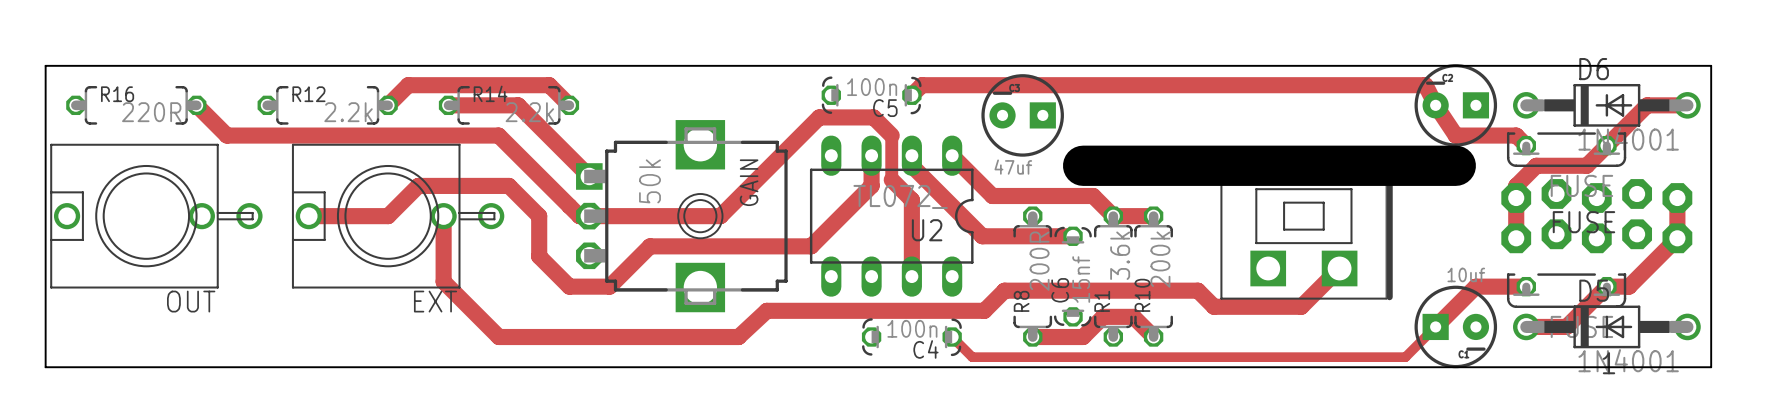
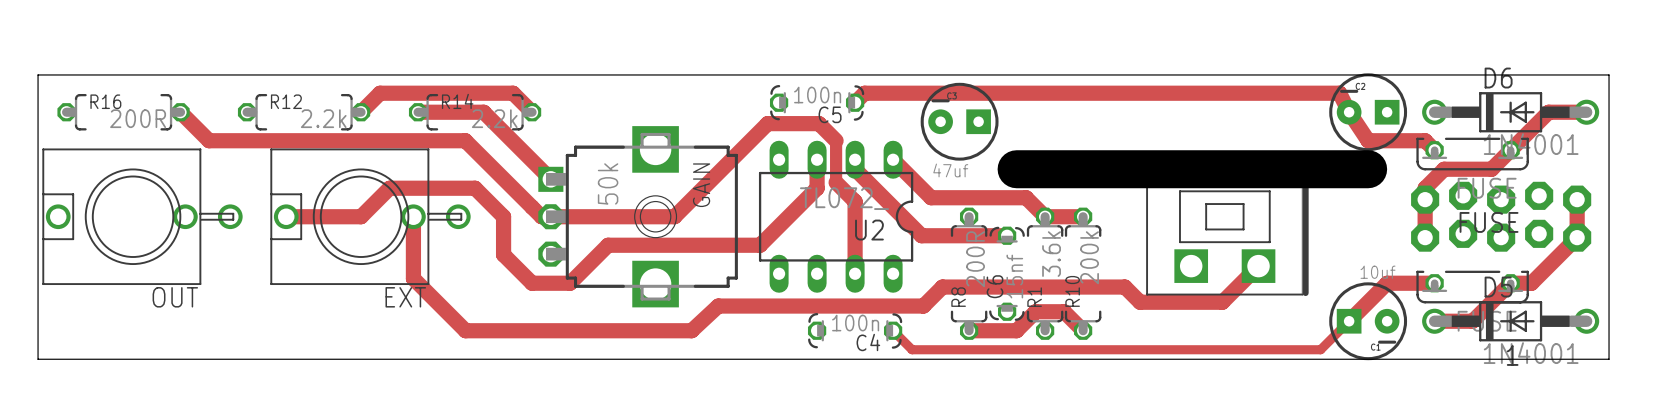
R16 value: 220R (151, 112) -> 200R (138, 118)

